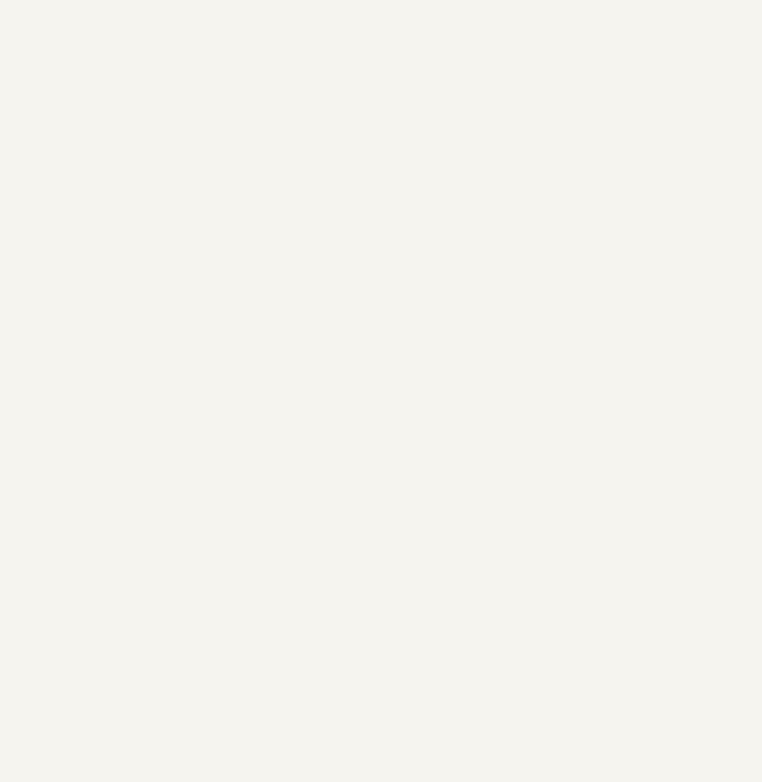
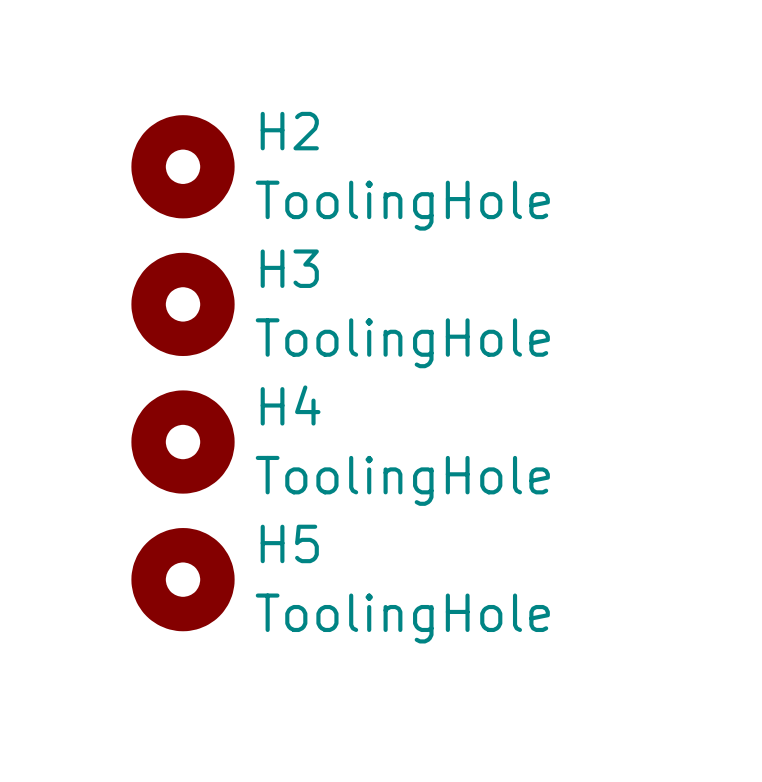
H2: none -> ToolingHole (183, 166)
H3: none -> ToolingHole (183, 304)
H4: none -> ToolingHole (183, 442)
H5: none -> ToolingHole (183, 579)

